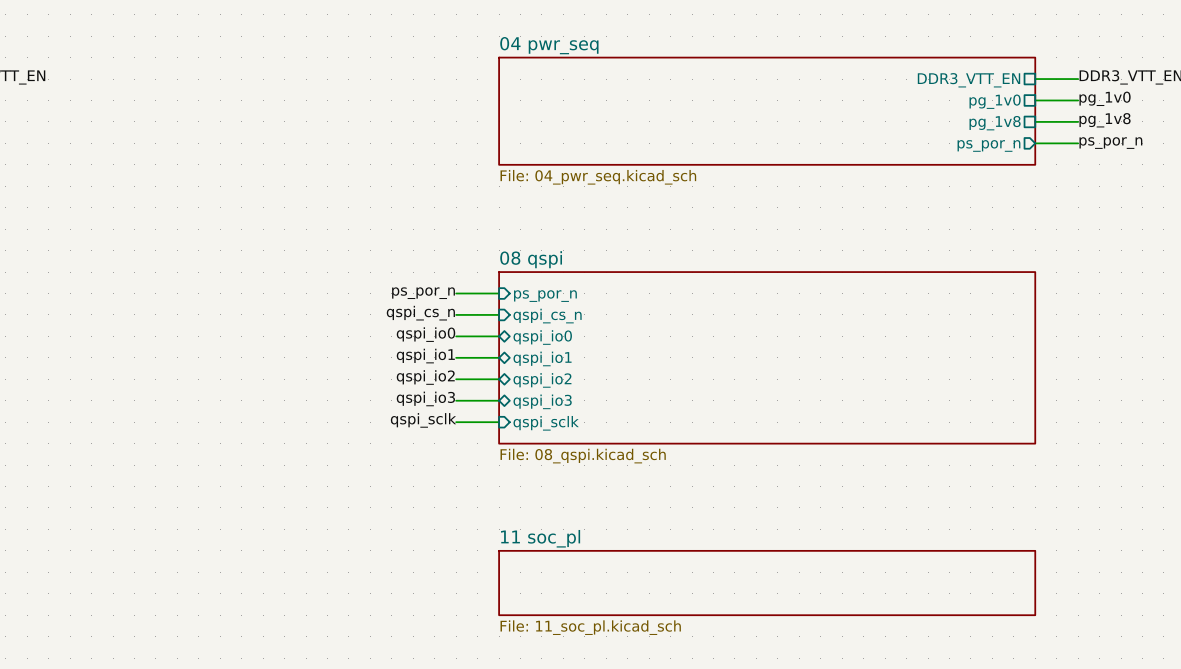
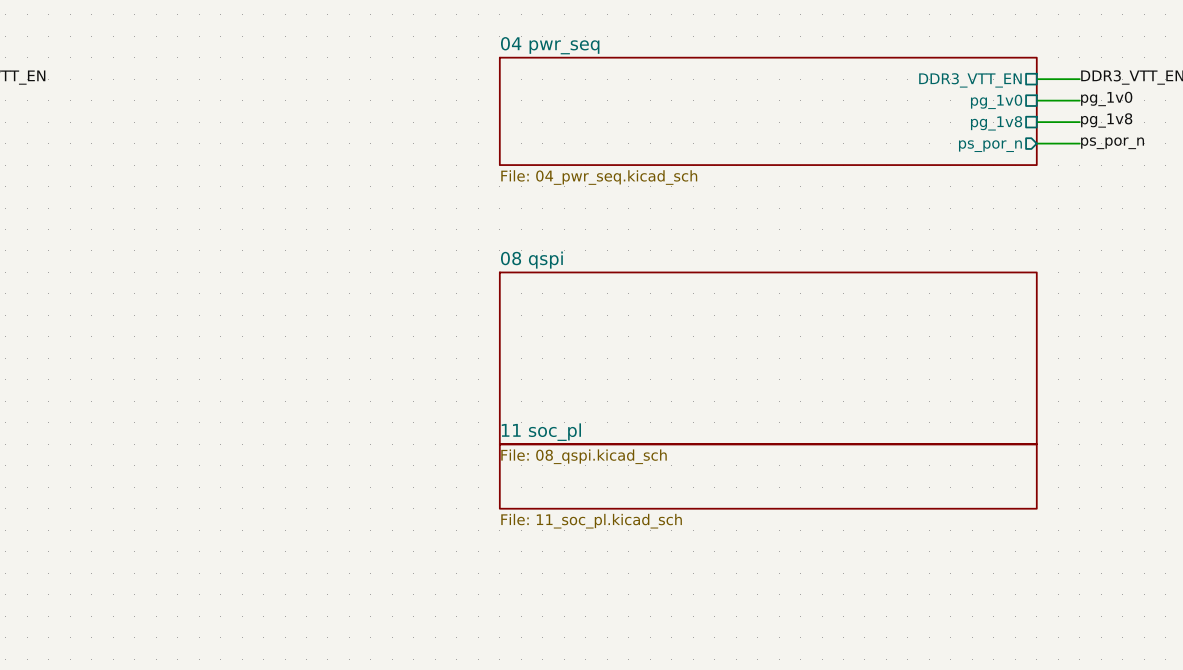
label: ps_por_n (423, 293) -> none
wire: (456, 293) (499, 293) -> none
sheet pin: ps_por_n (545, 296) -> none
label: qspi_cs_n (420, 313) -> none
wire: (456, 314) (499, 314) -> none
sheet pin: qspi_cs_n (547, 316) -> none
label: qspi_io0 (425, 334) -> none
wire: (456, 336) (499, 336) -> none
sheet pin: qspi_io0 (542, 337) -> none
label: qspi_io1 (425, 356) -> none
wire: (456, 357) (499, 357) -> none
sheet pin: qspi_io1 (542, 358) -> none
label: qspi_io2 (425, 377) -> none
wire: (456, 379) (499, 379) -> none
sheet pin: qspi_io2 (542, 380) -> none
label: qspi_io3 (425, 398) -> none
wire: (456, 400) (499, 400) -> none
sheet pin: qspi_io3 (542, 401) -> none
label: qspi_sclk (423, 420) -> none
wire: (456, 422) (499, 422) -> none
sheet pin: qspi_sclk (546, 423) -> none
sheet 11 soc_pl position: (767, 583) -> (768, 476)

